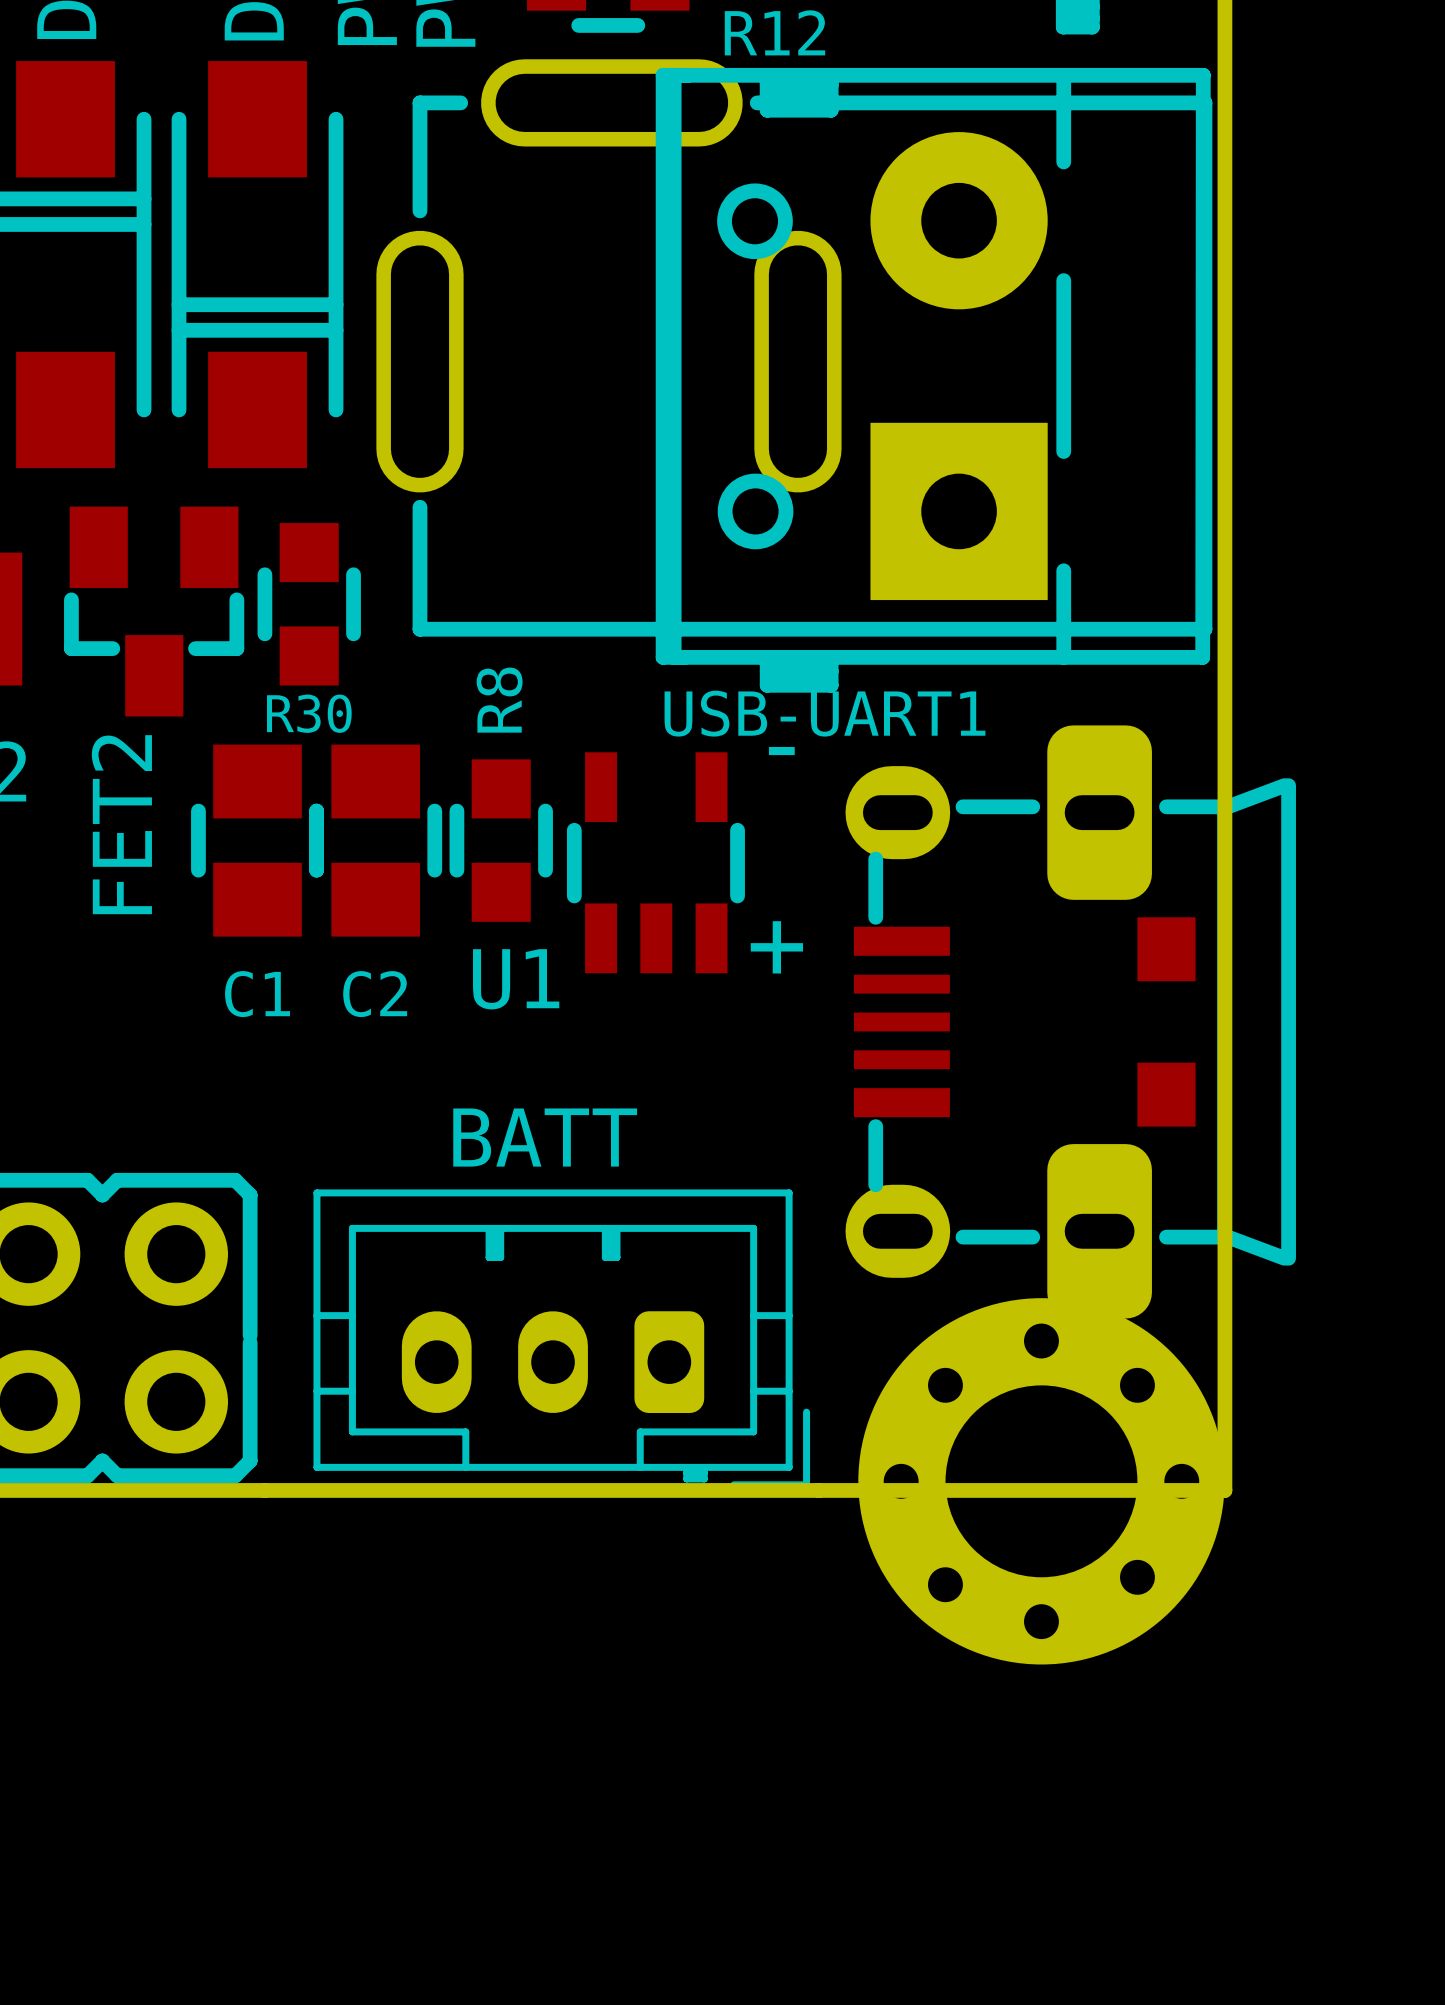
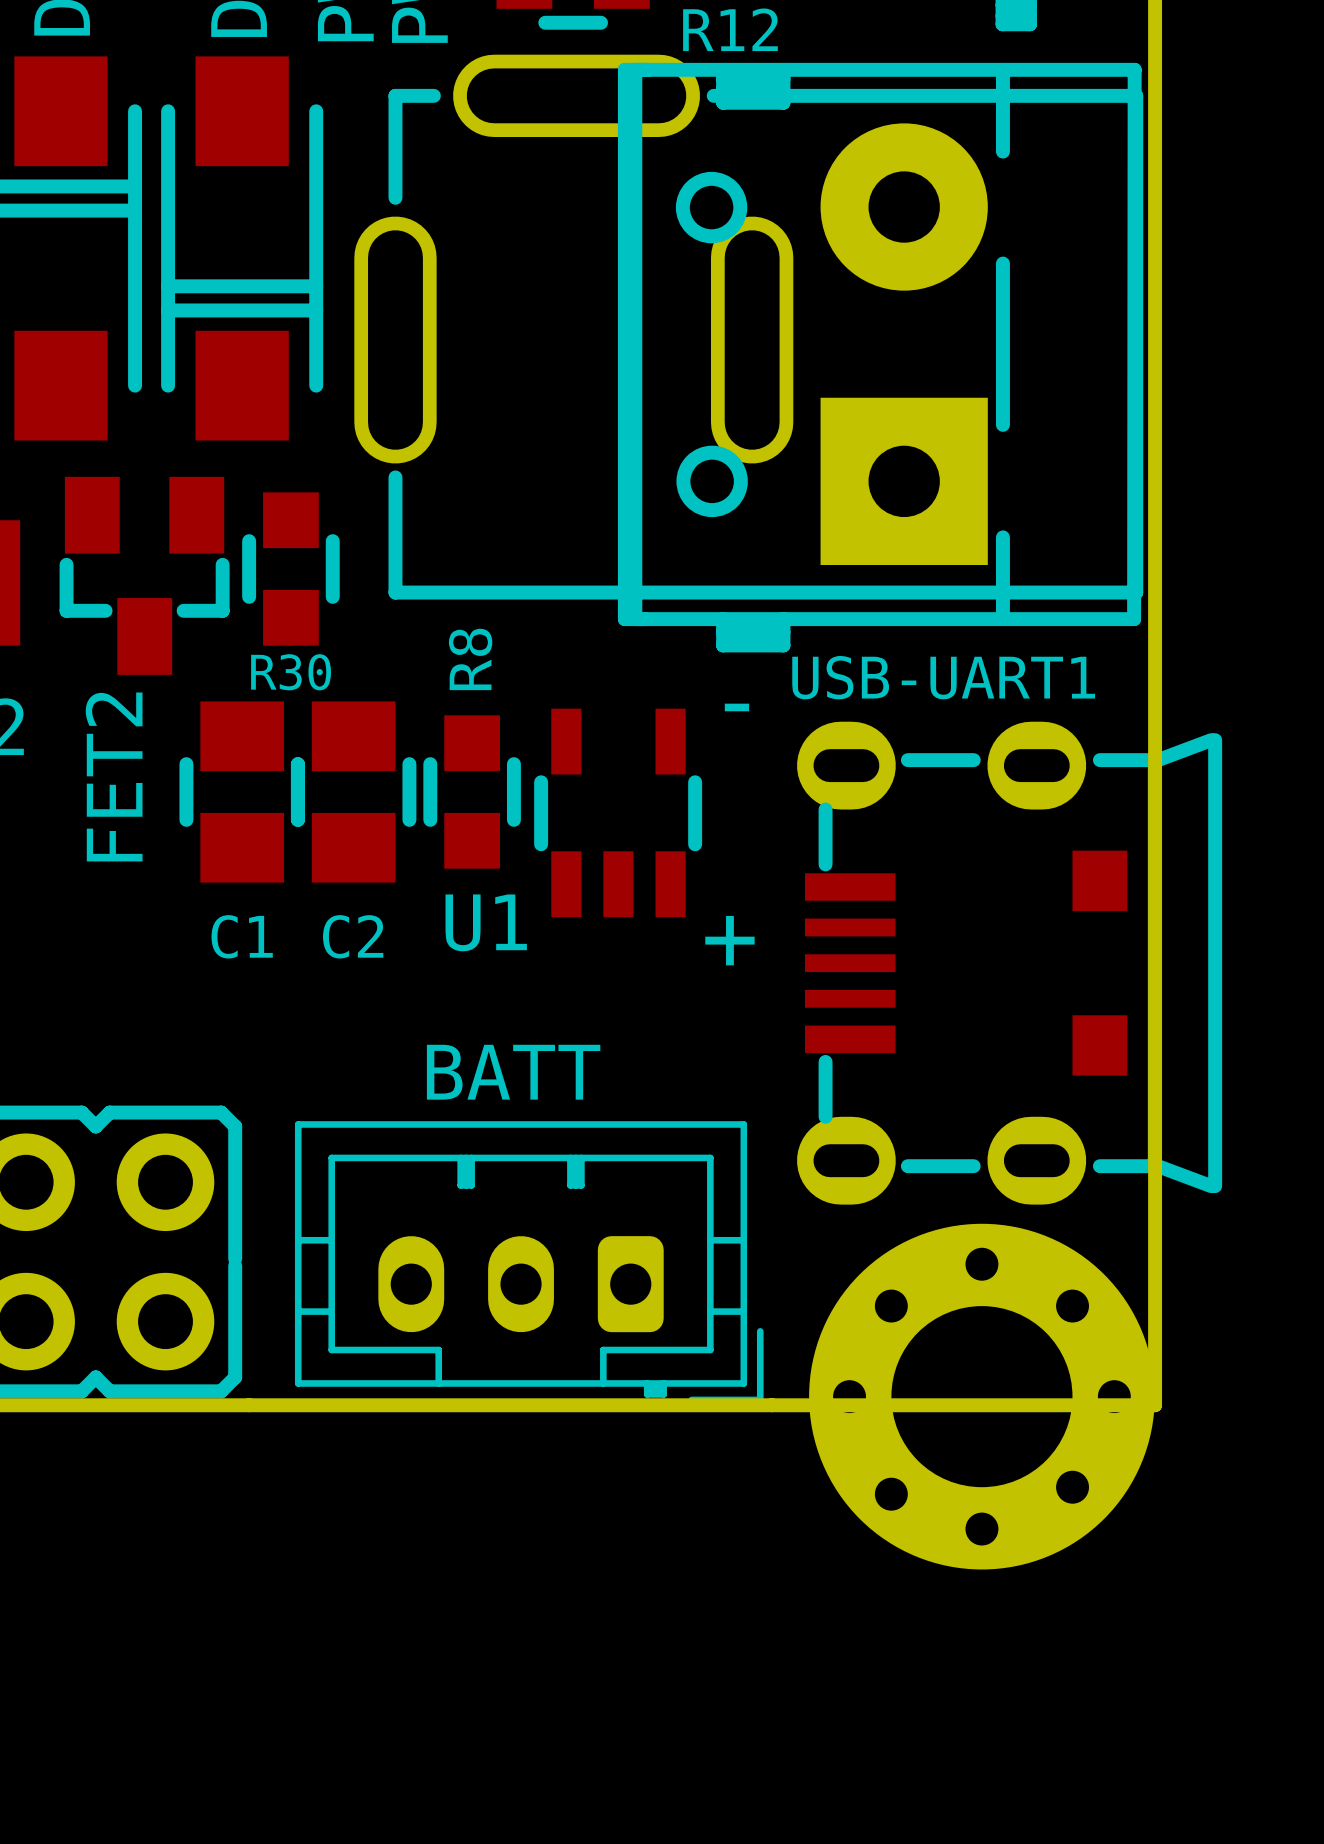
USB-UART1 name position: USB-UART1 (824, 713) -> USB-UART1 (943, 677)
USB-UART1 footprint: [845, 725, 1296, 1319] -> [797, 721, 1223, 1205]
text position: + (776, 947) -> + (729, 940)

